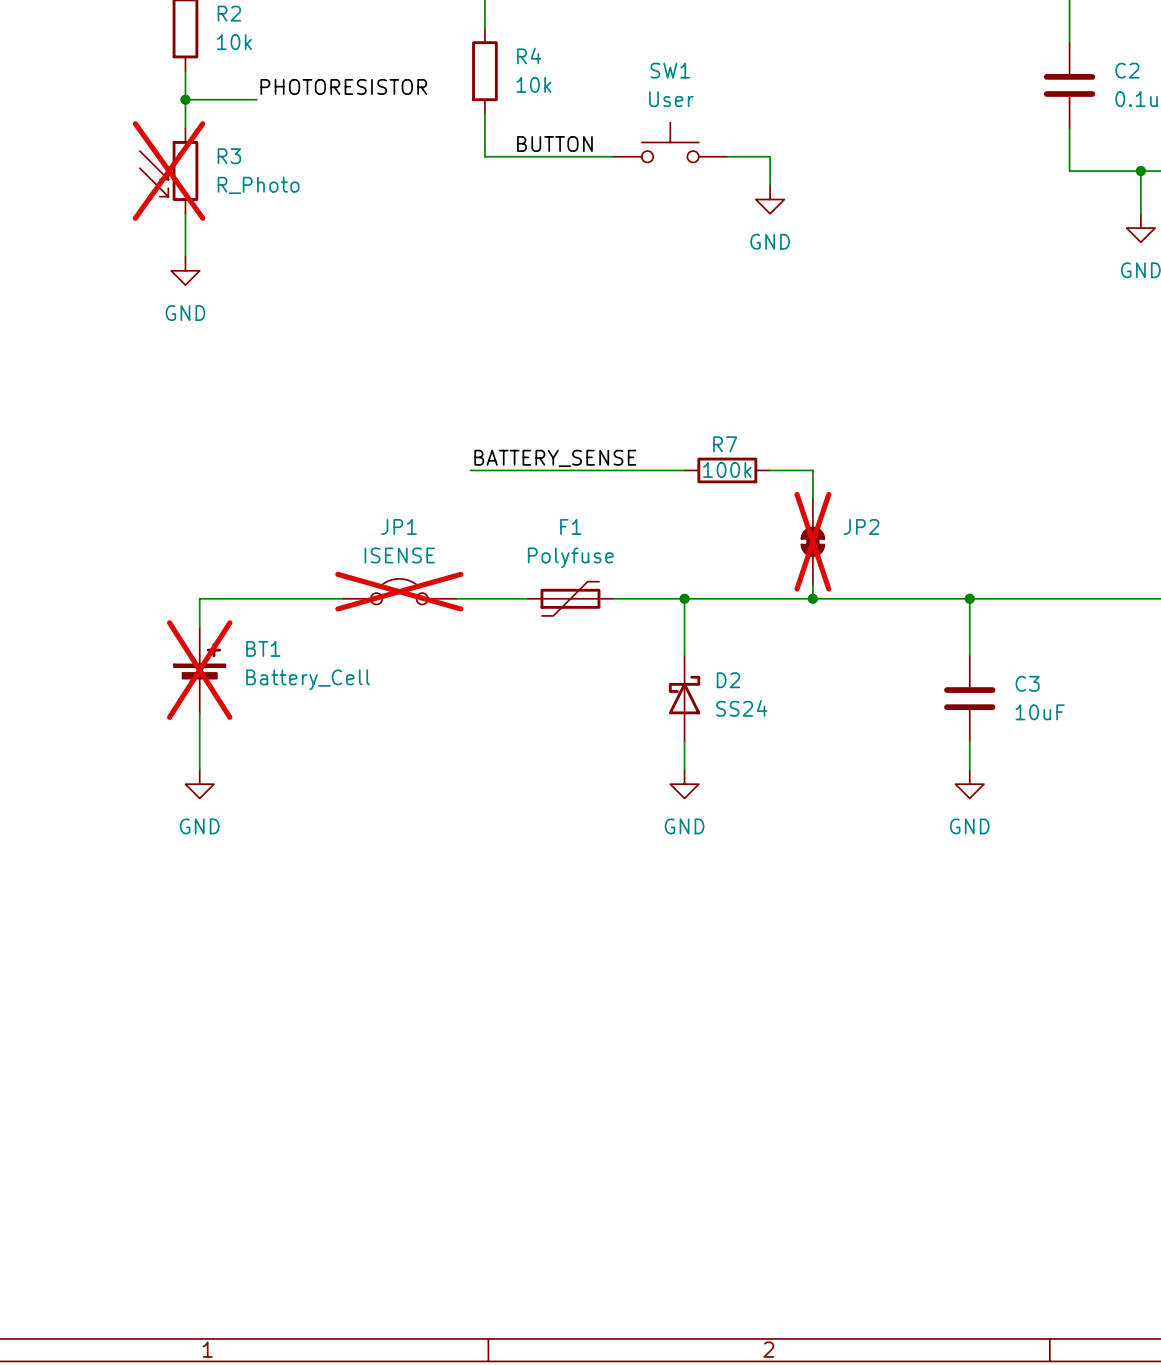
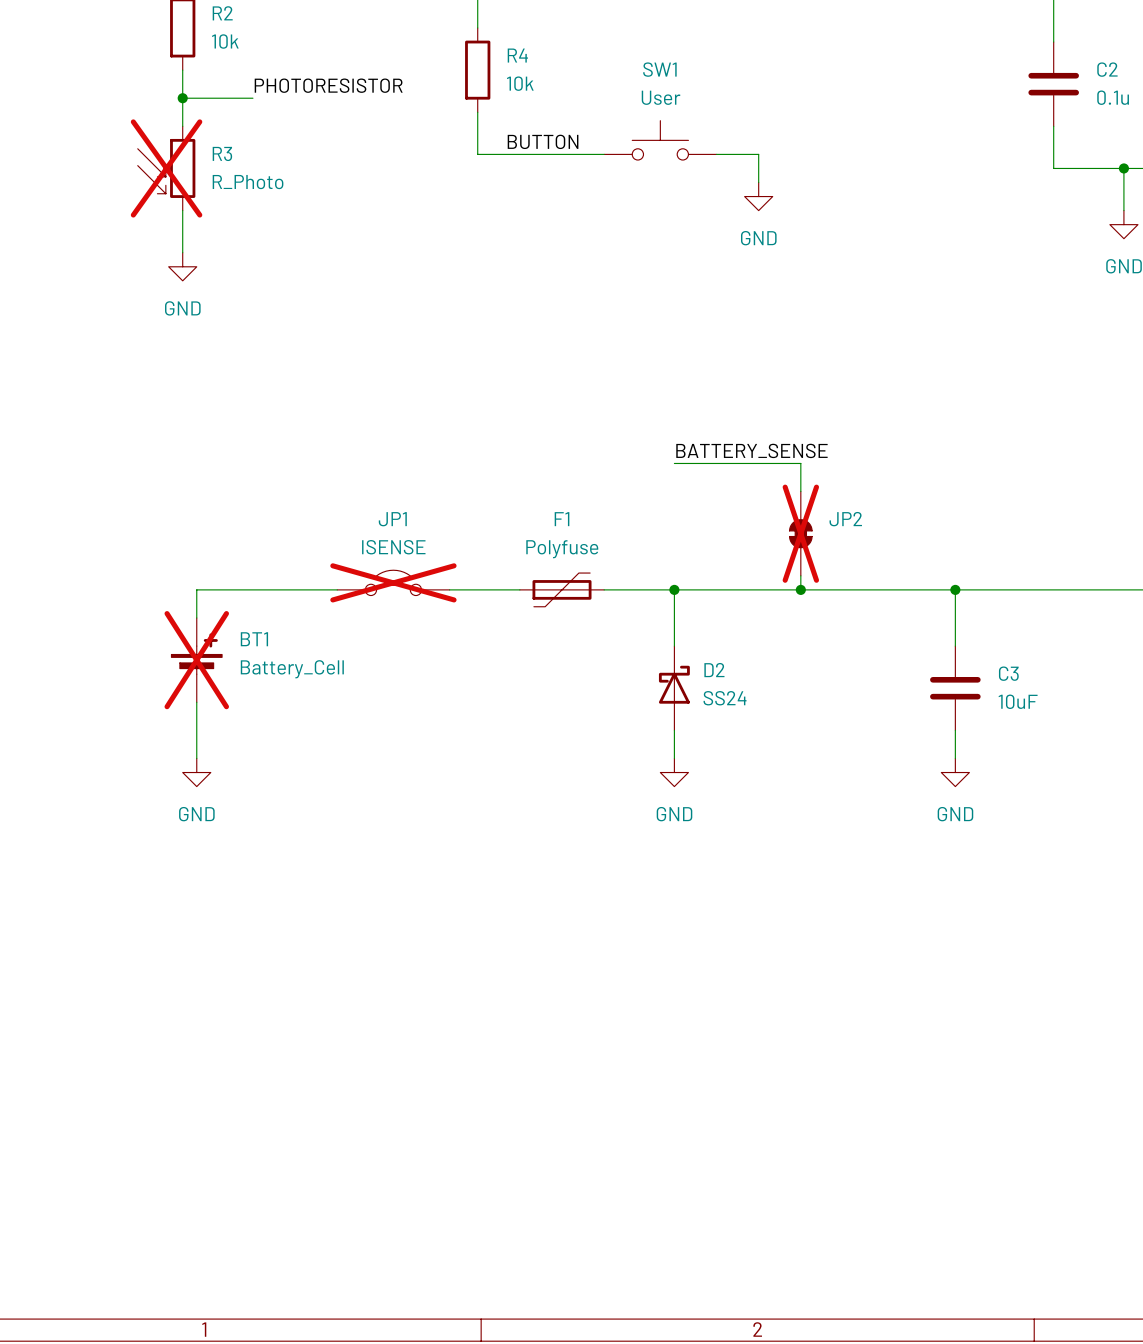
label position: BATTERY_SENSE (555, 458) -> BATTERY_SENSE (751, 450)
wire: (470, 470) (684, 470) -> (758, 463) (674, 463)
R7: 100k (727, 470) -> none

